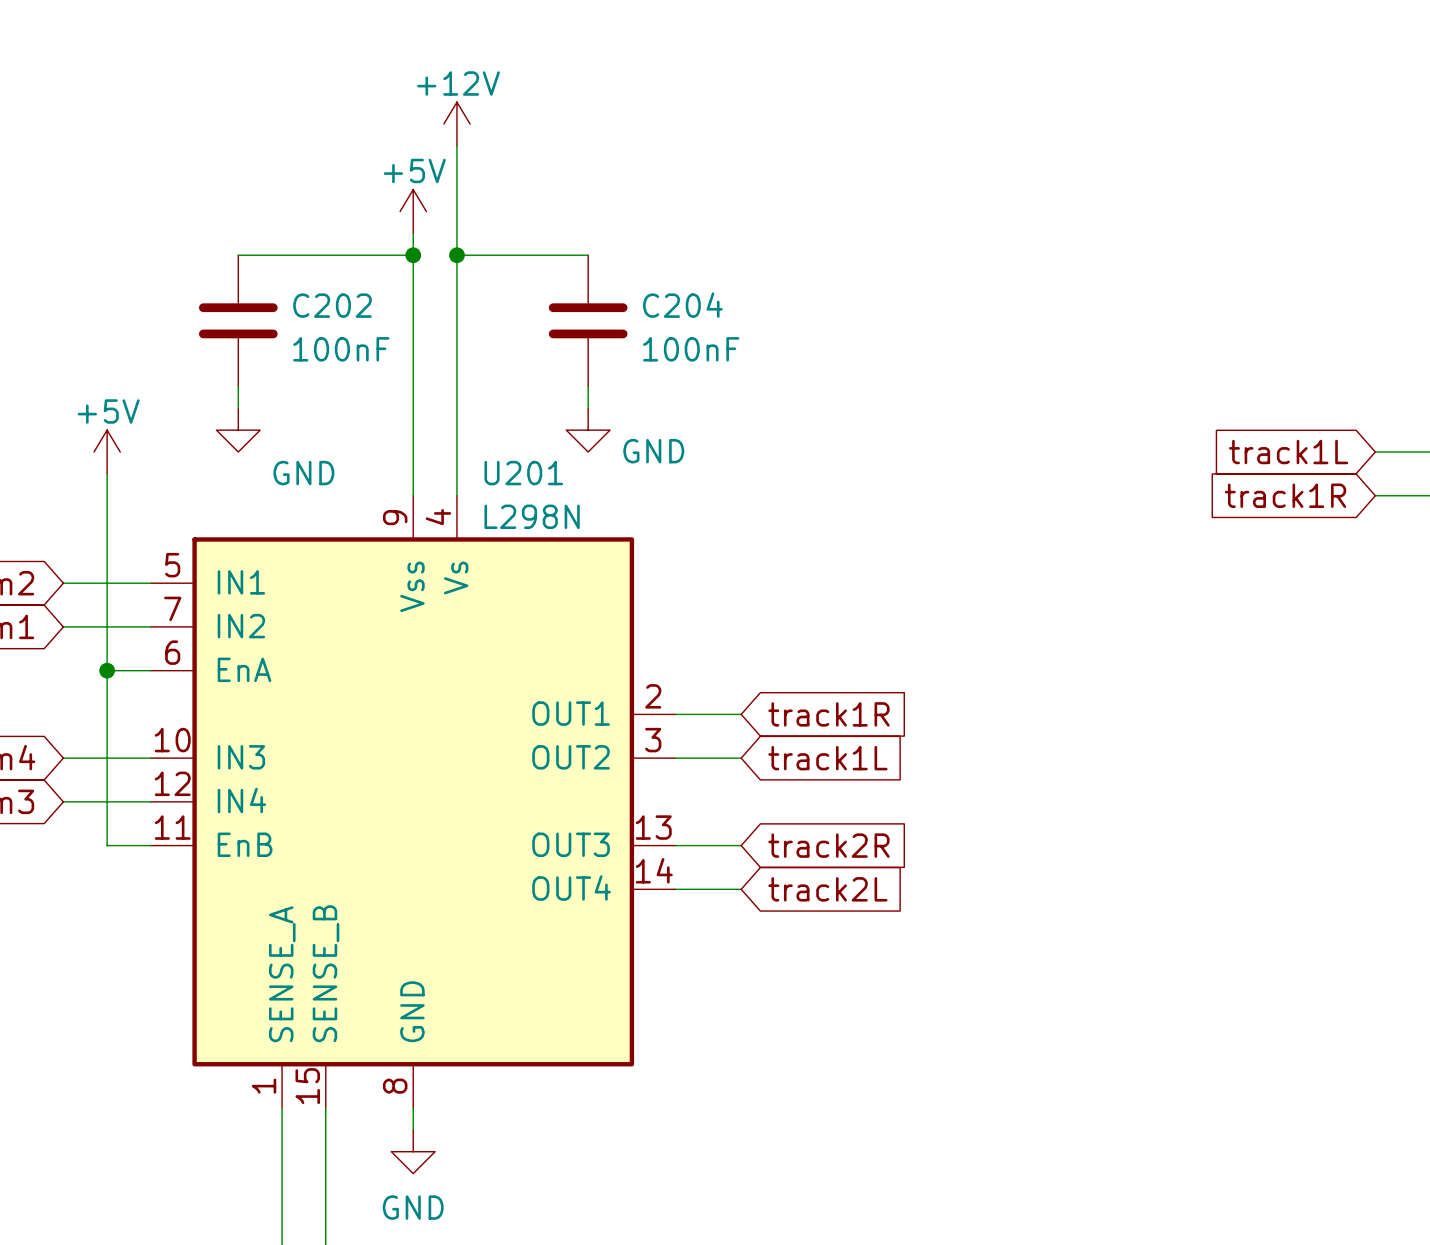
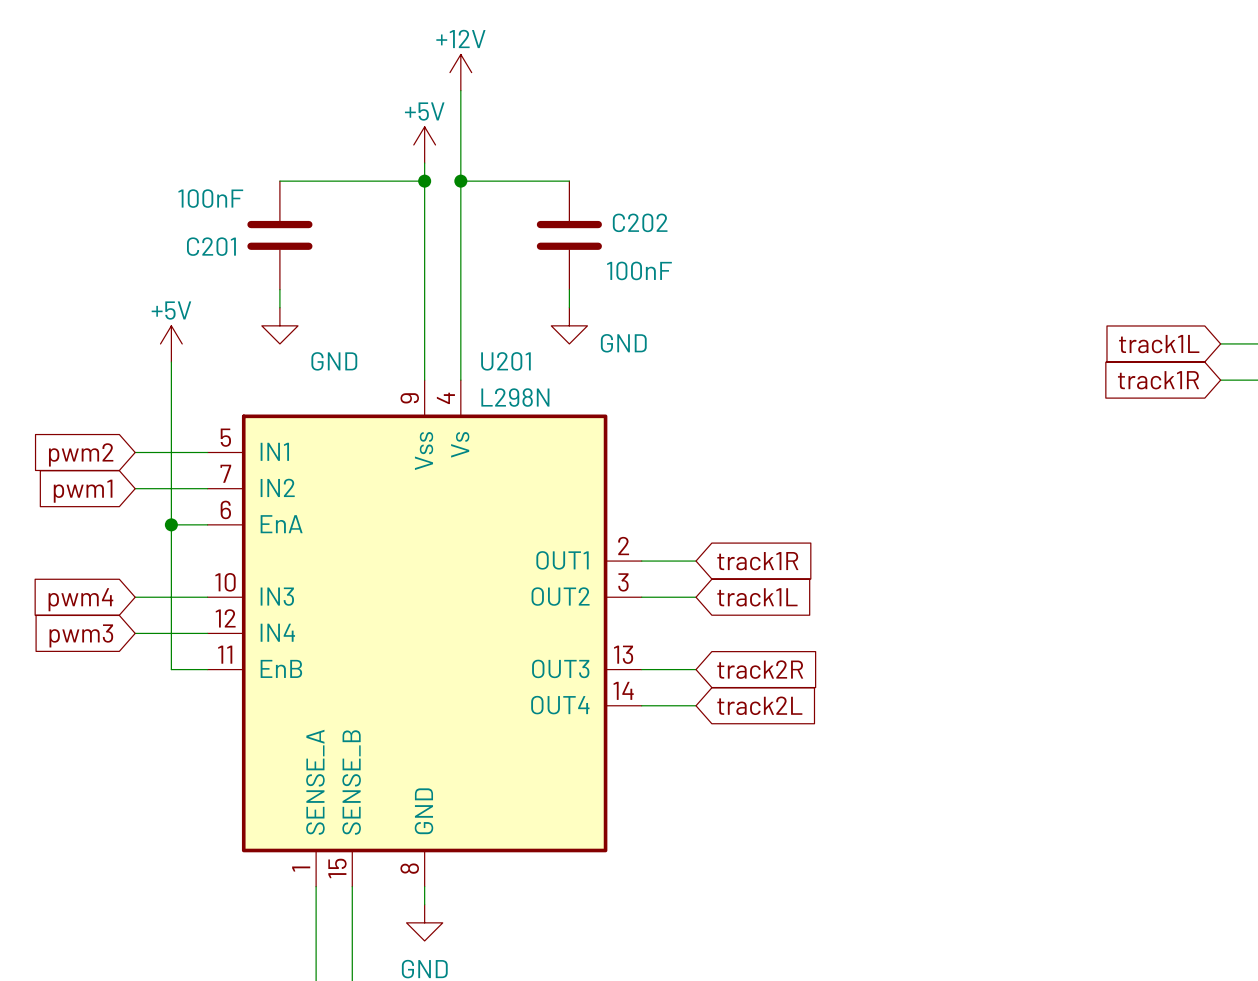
C202 name: C202 (332, 305) -> C201 (211, 246)
C204 name: C204 (682, 305) -> C202 (640, 222)
C202 value position: 100nF (341, 349) -> 100nF (210, 198)
C204 value position: 100nF (691, 349) -> 100nF (639, 270)

